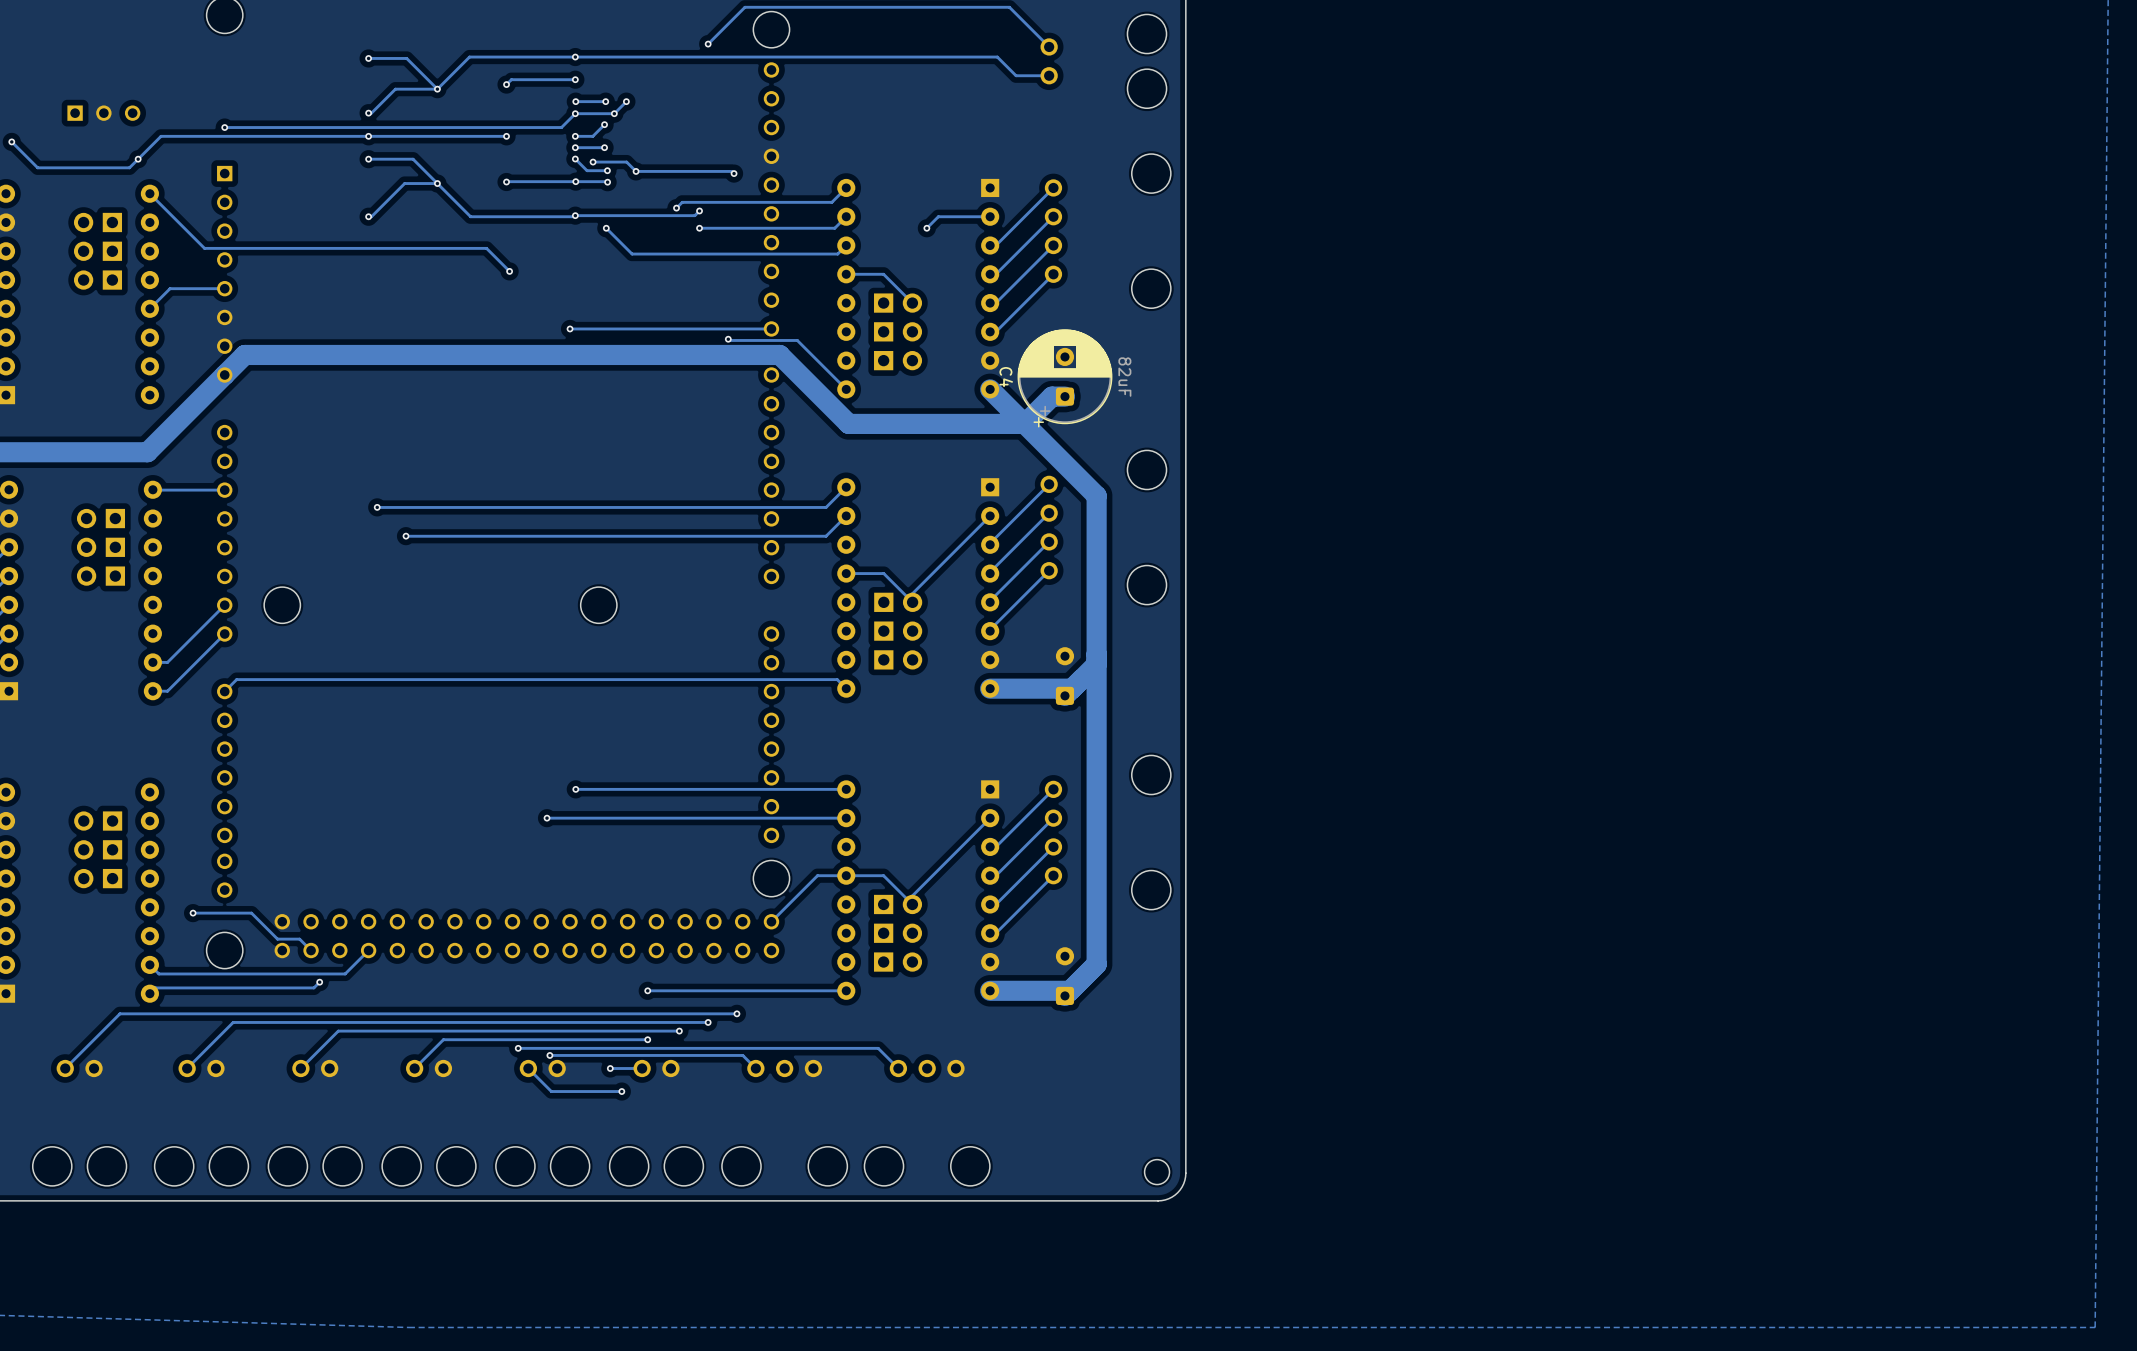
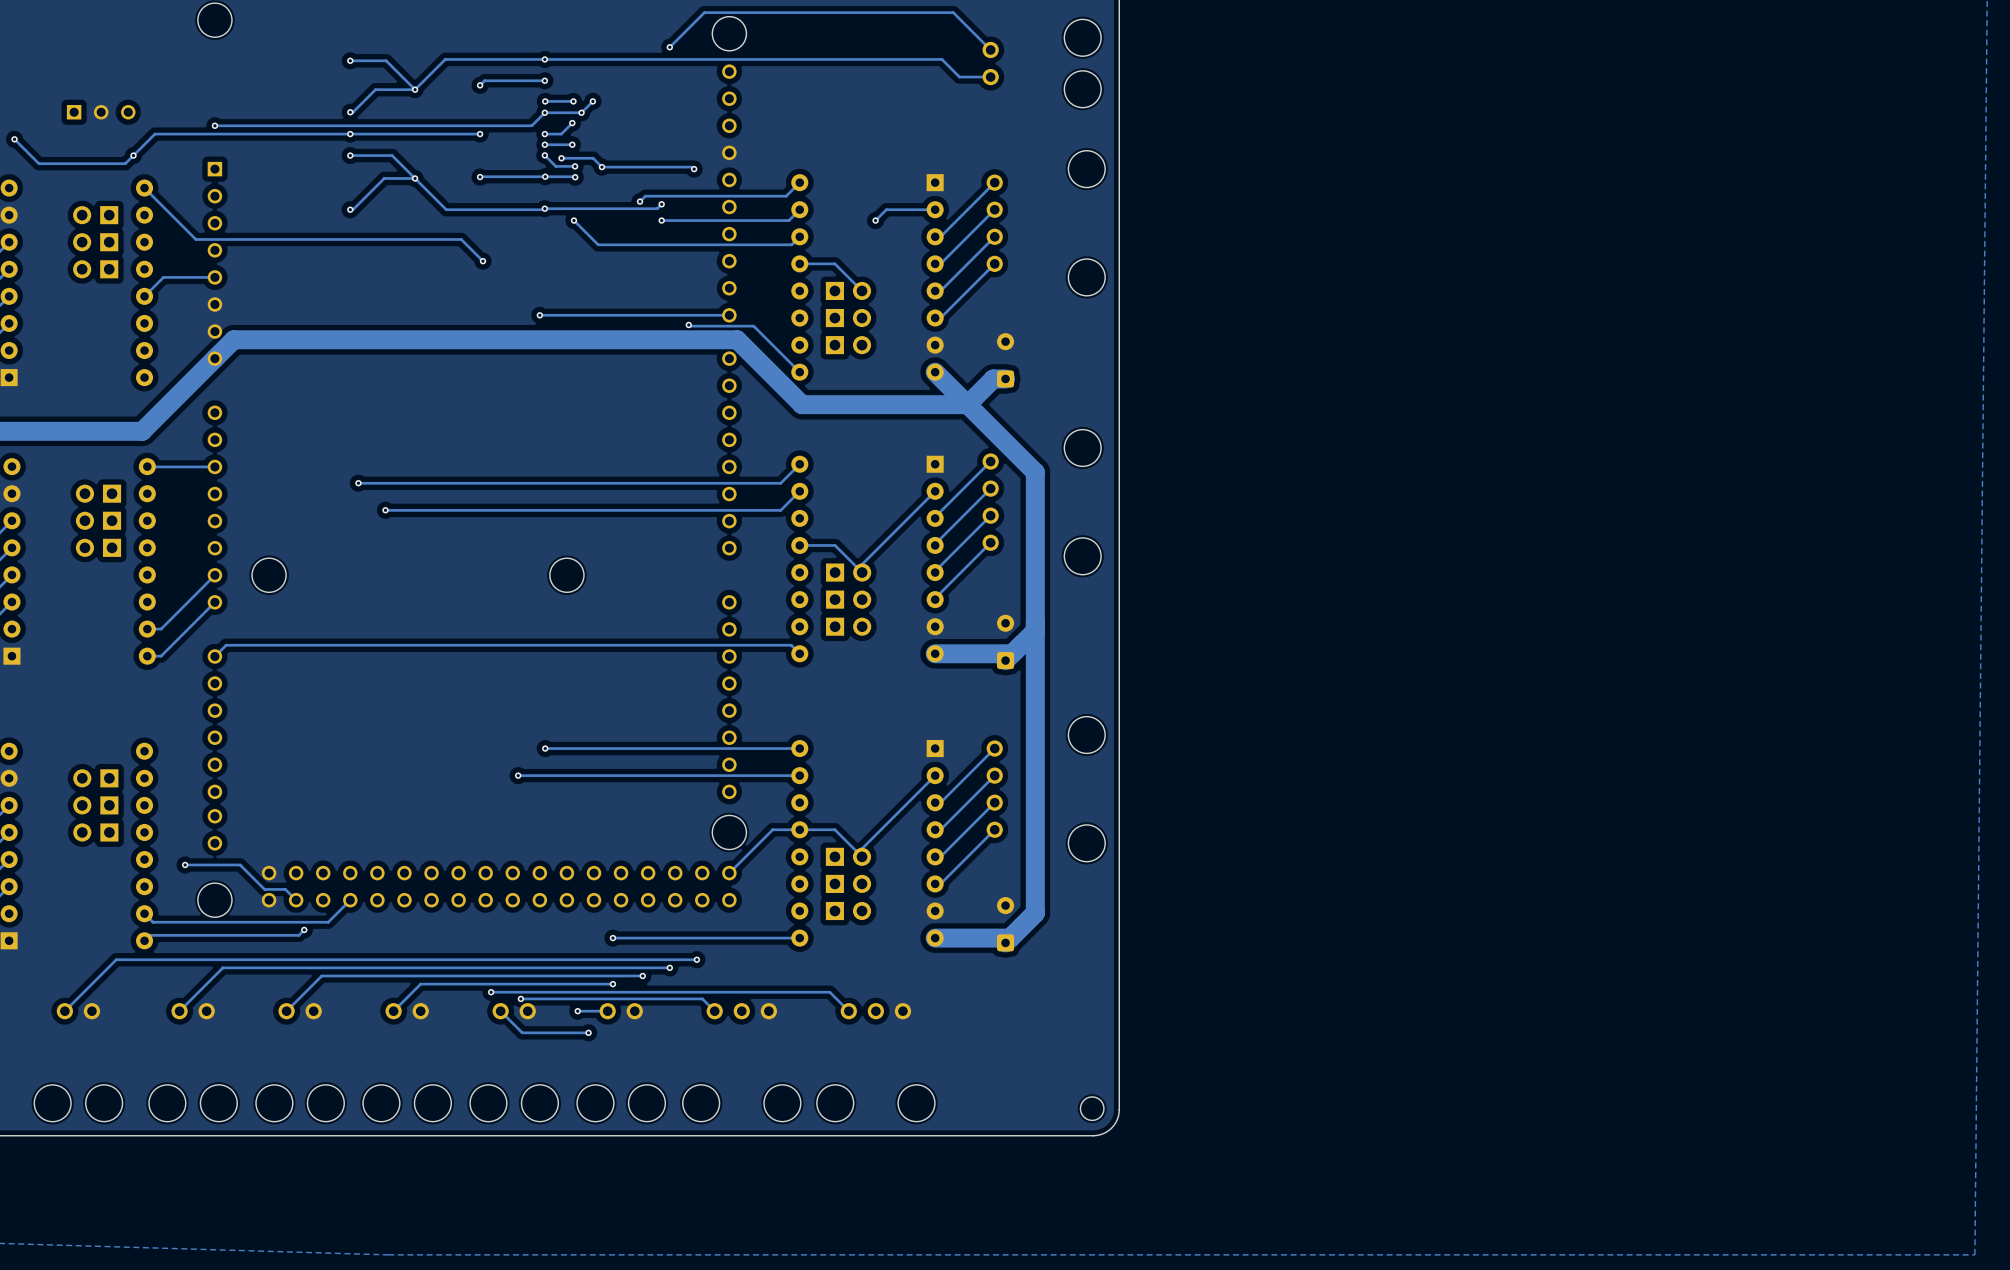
C4 side: bottom (1064, 378) -> top (1005, 360)

